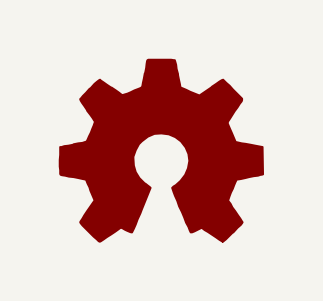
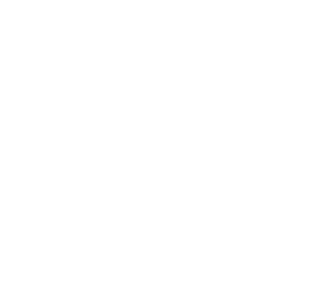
power symbol: (161, 150) -> none

